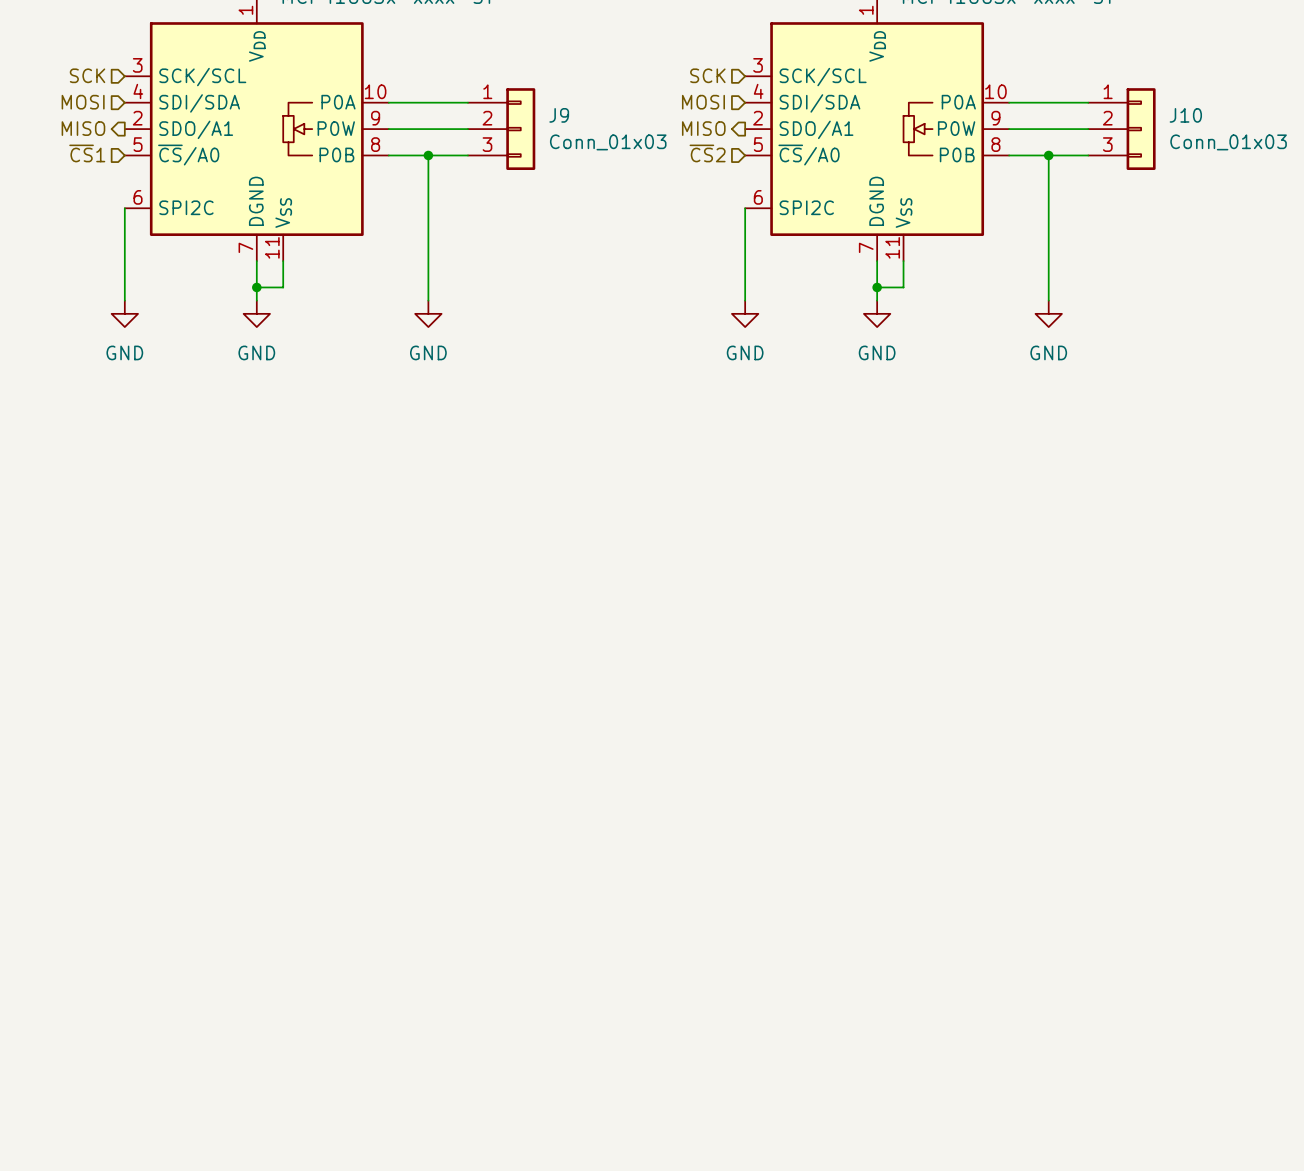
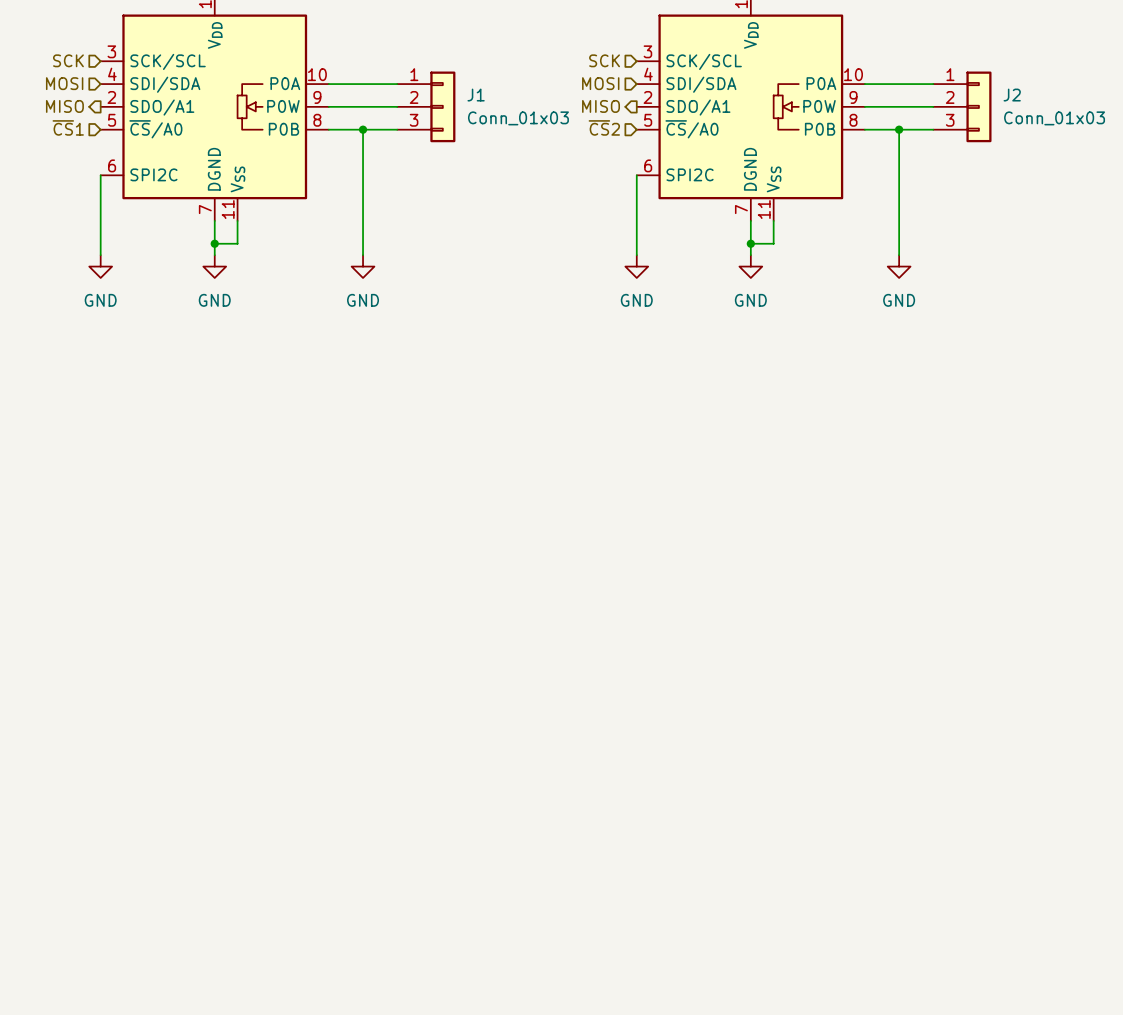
J9 name: J9 (559, 115) -> J1 (476, 95)
J10 name: J10 (1185, 115) -> J2 (1012, 95)

